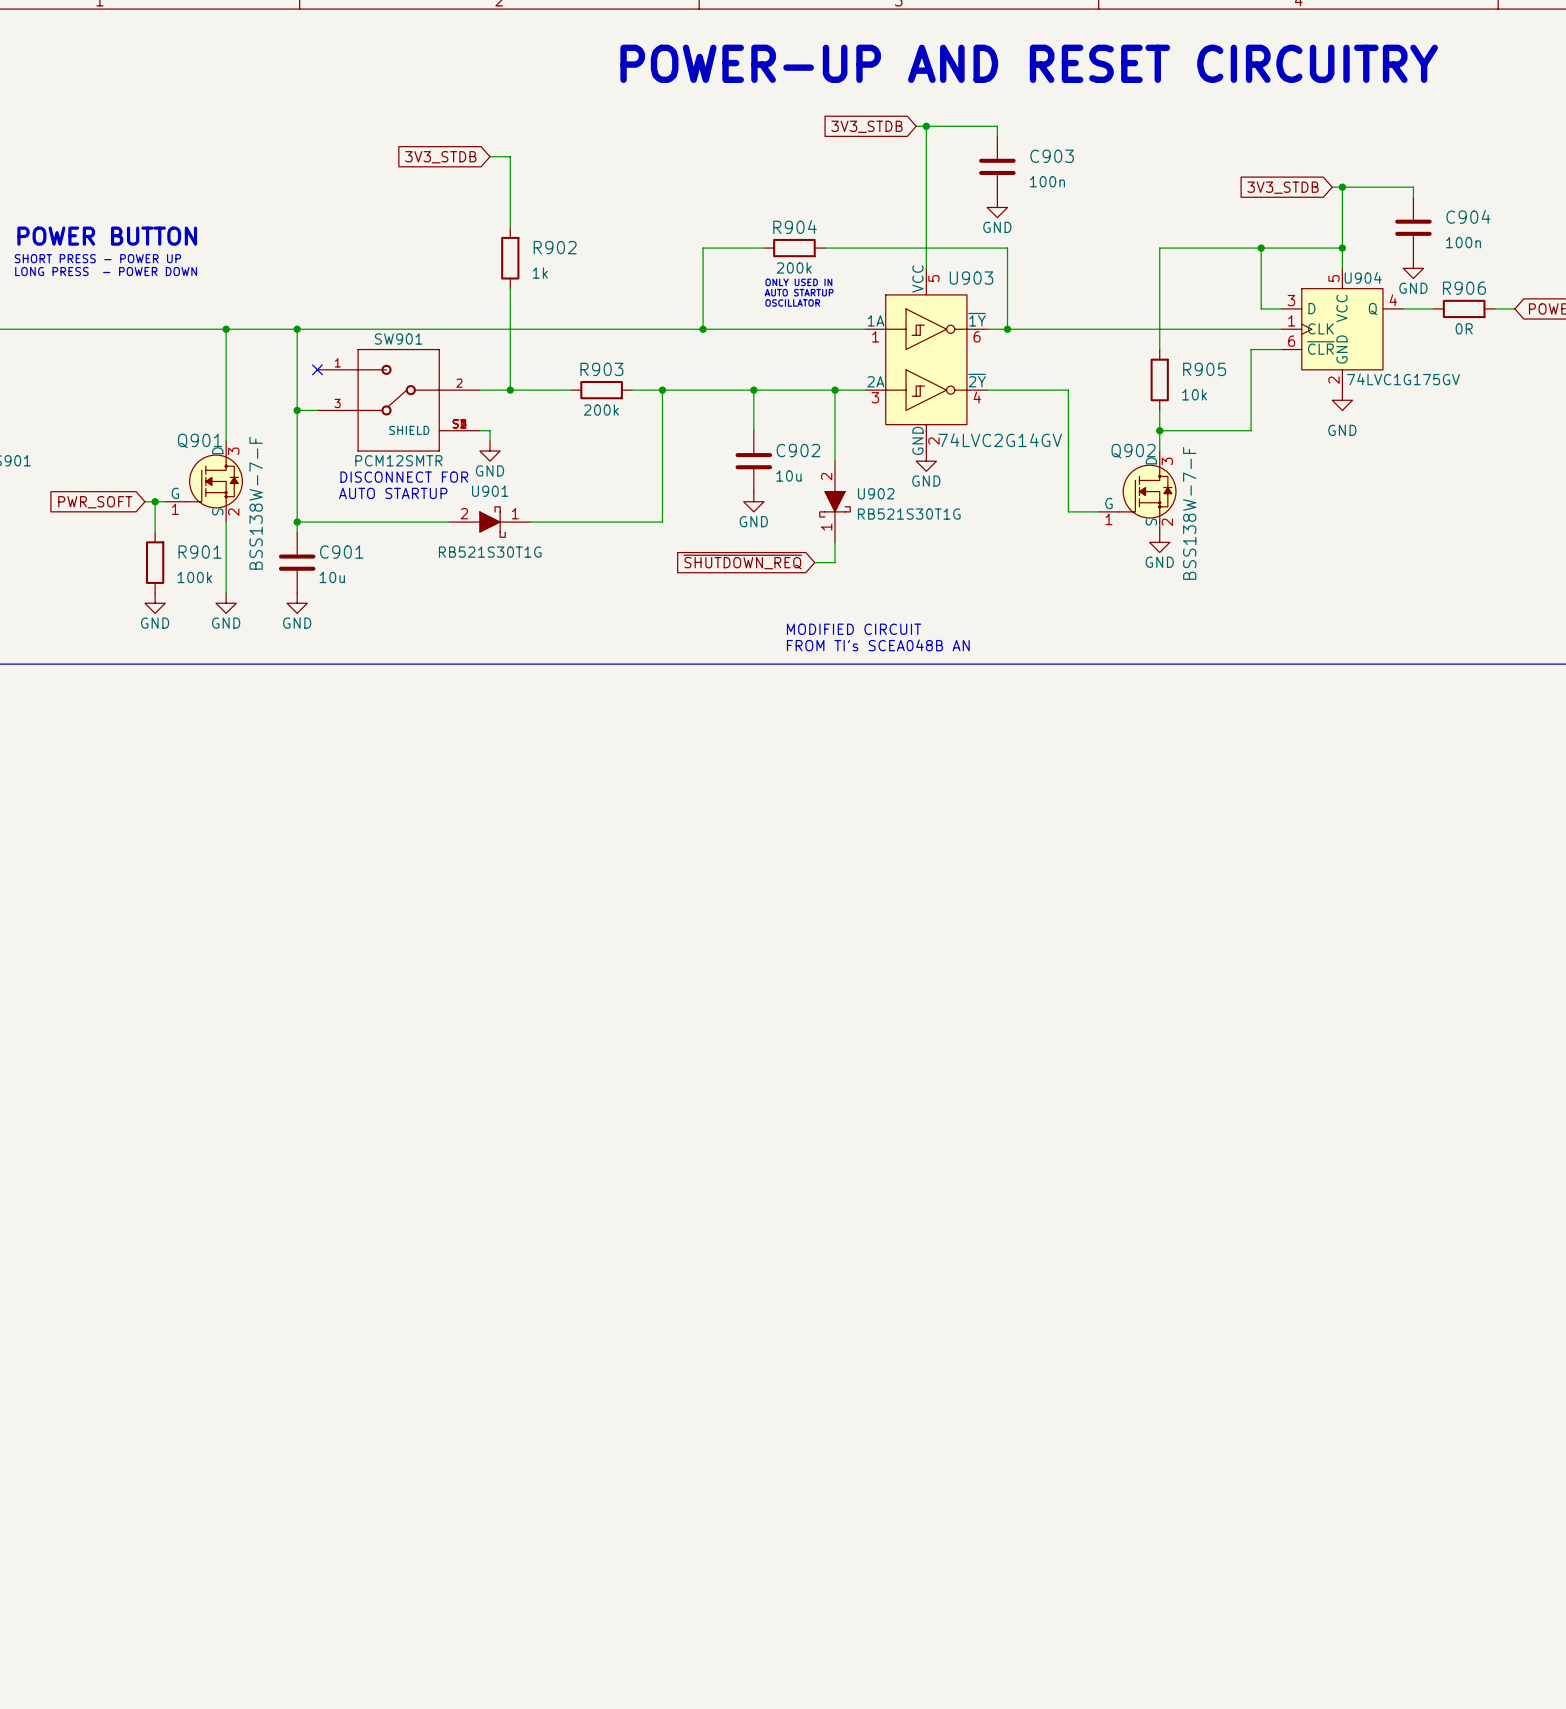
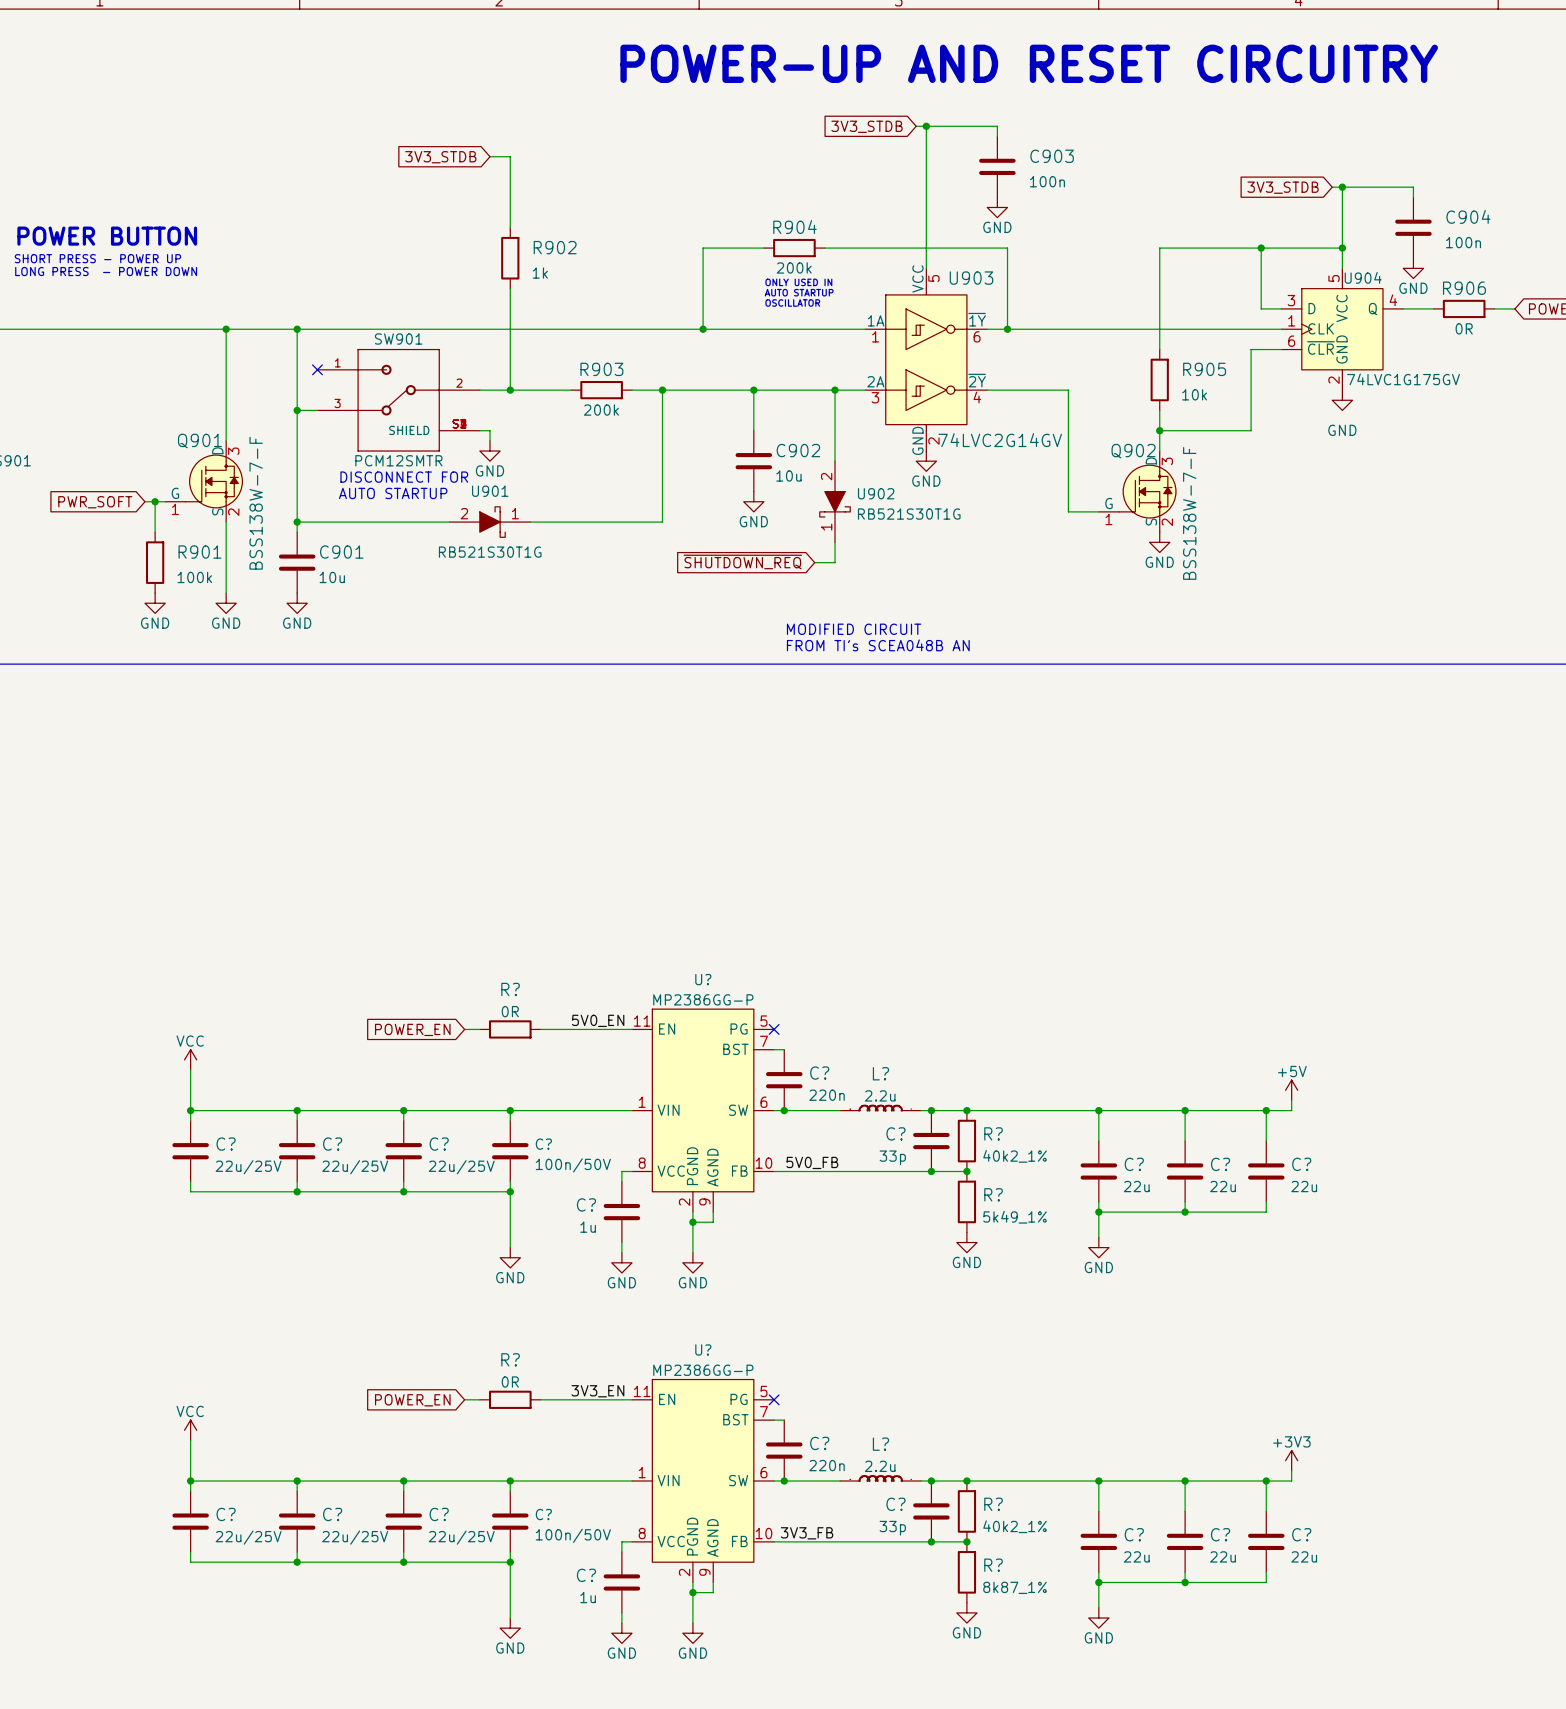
label: none -> 5V0_EN (598, 1020)
global label: none -> POWER_EN (412, 1029)
wire: none -> (464, 1029) (479, 1029)
R?: none -> (510, 1029)
wire: none -> (540, 1029) (632, 1029)
no-connect mark: none -> (774, 1029)
wire: none -> (774, 1049) (784, 1049)
power symbol: none -> VCC (190, 1059)
wire: none -> (190, 1070) (190, 1120)
C?: none -> (784, 1080)
power symbol: none -> +5V (1291, 1090)
wire: none -> (1291, 1100) (1291, 1110) (921, 1110)
L?: none -> (880, 1108)
wire: none -> (190, 1110) (632, 1110)
junction: none -> (190, 1110)
wire: none -> (297, 1110) (297, 1120)
junction: none -> (297, 1110)
wire: none -> (403, 1110) (403, 1120)
junction: none -> (403, 1110)
wire: none -> (510, 1110) (510, 1120)
junction: none -> (510, 1110)
U?: none -> MP2386GG-P (703, 1110)
wire: none -> (774, 1110) (840, 1110)
junction: none -> (784, 1110)
junction: none -> (931, 1110)
junction: none -> (966, 1110)
wire: none -> (1098, 1110) (1098, 1141)
junction: none -> (1098, 1110)
wire: none -> (1185, 1110) (1185, 1141)
junction: none -> (1185, 1110)
wire: none -> (1266, 1110) (1266, 1141)
junction: none -> (1266, 1110)
C?: none -> (931, 1141)
R?: none -> (966, 1141)
C?: none -> (190, 1151)
C?: none -> (297, 1151)
C?: none -> (403, 1151)
C?: none -> (510, 1151)
label: none -> 5V0_FB (812, 1162)
wire: none -> (632, 1171) (621, 1171) (621, 1181)
wire: none -> (774, 1171) (966, 1171)
junction: none -> (931, 1171)
junction: none -> (966, 1171)
C?: none -> (1098, 1171)
C?: none -> (1185, 1171)
C?: none -> (1266, 1171)
wire: none -> (190, 1181) (190, 1191) (510, 1191)
wire: none -> (297, 1181) (297, 1191)
wire: none -> (403, 1181) (403, 1191)
wire: none -> (510, 1181) (510, 1247)
junction: none -> (297, 1191)
junction: none -> (403, 1191)
junction: none -> (510, 1191)
R?: none -> (966, 1201)
wire: none -> (1098, 1201) (1098, 1237)
wire: none -> (1185, 1201) (1185, 1212)
wire: none -> (1266, 1201) (1266, 1212) (1098, 1212)
C?: none -> (621, 1212)
wire: none -> (692, 1212) (692, 1252)
wire: none -> (713, 1212) (713, 1222) (692, 1222)
junction: none -> (1098, 1212)
junction: none -> (1185, 1212)
junction: none -> (692, 1222)
wire: none -> (621, 1242) (621, 1252)
power symbol: none -> GND (966, 1242)
power symbol: none -> GND (1098, 1247)
power symbol: none -> GND (510, 1257)
power symbol: none -> GND (621, 1262)
power symbol: none -> GND (692, 1262)
label: none -> 3V3_EN (597, 1391)
wire: none -> (464, 1399) (479, 1399)
R?: none -> (510, 1399)
wire: none -> (540, 1399) (632, 1399)
no-connect mark: none -> (774, 1399)
global label: none -> POWER_EN (412, 1400)
wire: none -> (774, 1420) (784, 1420)
power symbol: none -> VCC (190, 1430)
wire: none -> (190, 1440) (190, 1491)
C?: none -> (784, 1450)
power symbol: none -> +3V3 (1291, 1460)
wire: none -> (1291, 1470) (1291, 1481) (921, 1481)
L?: none -> (880, 1478)
U?: none -> MP2386GG-P (703, 1480)
wire: none -> (190, 1481) (632, 1481)
junction: none -> (190, 1481)
wire: none -> (297, 1481) (297, 1491)
junction: none -> (297, 1481)
wire: none -> (403, 1481) (403, 1491)
junction: none -> (403, 1481)
wire: none -> (510, 1481) (510, 1491)
junction: none -> (510, 1481)
wire: none -> (774, 1481) (840, 1481)
junction: none -> (784, 1481)
junction: none -> (931, 1481)
junction: none -> (966, 1481)
wire: none -> (1098, 1481) (1098, 1511)
junction: none -> (1098, 1481)
wire: none -> (1185, 1481) (1185, 1511)
junction: none -> (1185, 1481)
wire: none -> (1266, 1481) (1266, 1511)
junction: none -> (1266, 1481)
C?: none -> (931, 1511)
R?: none -> (966, 1511)
C?: none -> (190, 1521)
C?: none -> (297, 1521)
C?: none -> (403, 1521)
C?: none -> (510, 1521)
label: none -> 3V3_FB (807, 1533)
wire: none -> (632, 1541) (621, 1541) (621, 1552)
wire: none -> (774, 1541) (966, 1541)
junction: none -> (931, 1541)
junction: none -> (966, 1541)
C?: none -> (1098, 1541)
C?: none -> (1185, 1541)
C?: none -> (1266, 1541)
wire: none -> (190, 1552) (190, 1562) (510, 1562)
wire: none -> (297, 1552) (297, 1562)
wire: none -> (403, 1552) (403, 1562)
wire: none -> (510, 1552) (510, 1617)
junction: none -> (297, 1562)
junction: none -> (403, 1562)
junction: none -> (510, 1562)
R?: none -> (966, 1572)
wire: none -> (1098, 1572) (1098, 1607)
wire: none -> (1185, 1572) (1185, 1582)
wire: none -> (1266, 1572) (1266, 1582) (1098, 1582)
C?: none -> (621, 1582)
wire: none -> (692, 1582) (692, 1623)
wire: none -> (713, 1582) (713, 1592) (692, 1592)
junction: none -> (1098, 1582)
junction: none -> (1185, 1582)
junction: none -> (692, 1592)
wire: none -> (621, 1612) (621, 1623)
power symbol: none -> GND (966, 1612)
power symbol: none -> GND (1098, 1617)
power symbol: none -> GND (510, 1628)
power symbol: none -> GND (621, 1633)
power symbol: none -> GND (692, 1633)

